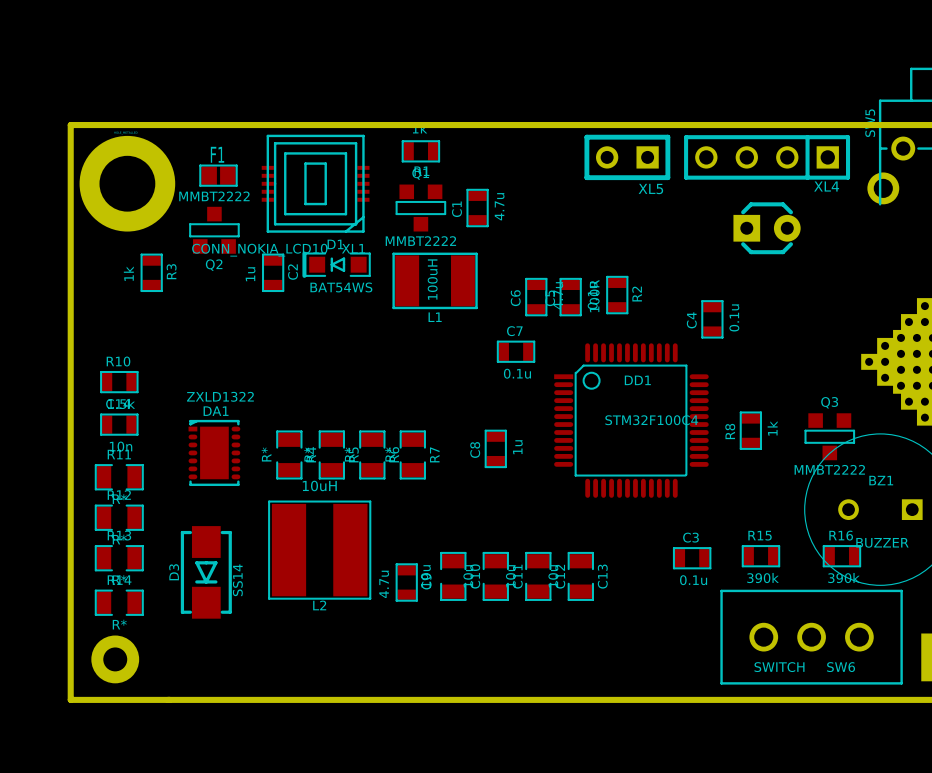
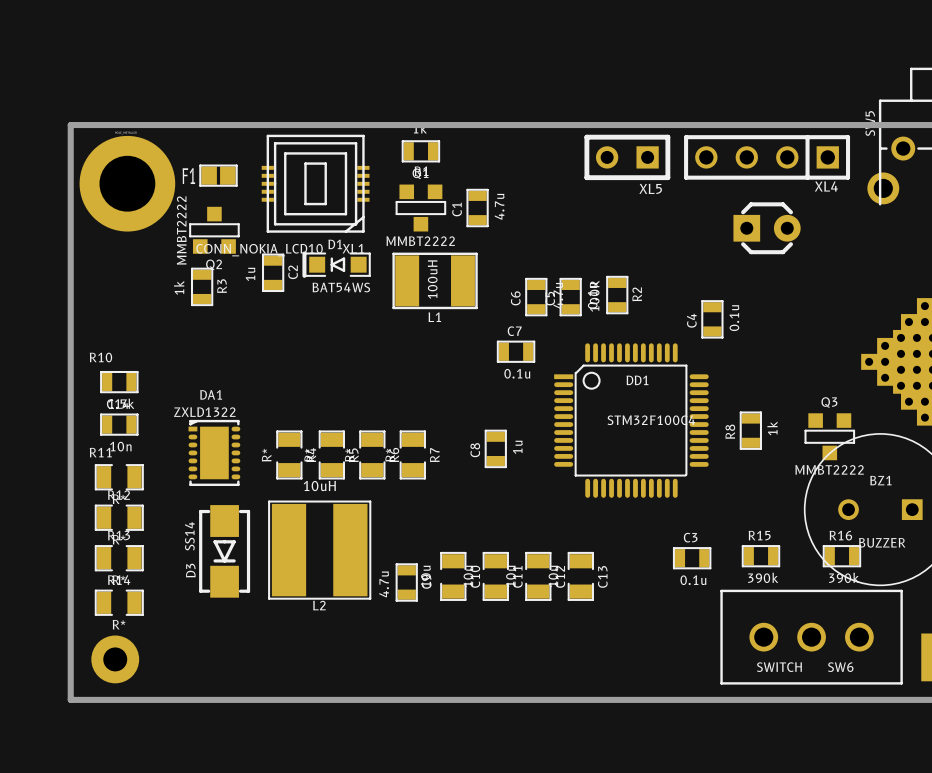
F1 name position: F1 (217, 154) -> F1 (188, 176)
Q2 value rotation: 0° (214, 196) -> 90° counterclockwise (181, 230)
R3 position: (151, 272) -> (202, 286)
R10 name position: R10 (118, 361) -> R10 (100, 357)
DA1 value position: ZXLD1322 (220, 396) -> ZXLD1322 (204, 412)
DA1 name position: DA1 (216, 411) -> DA1 (211, 394)
R11 name position: R11 (119, 454) -> R11 (100, 452)
D3 name position: D3 (174, 572) -> D3 (190, 570)
D3 position: (206, 572) -> (224, 551)
D3 value position: SS14 (237, 580) -> SS14 (189, 536)

